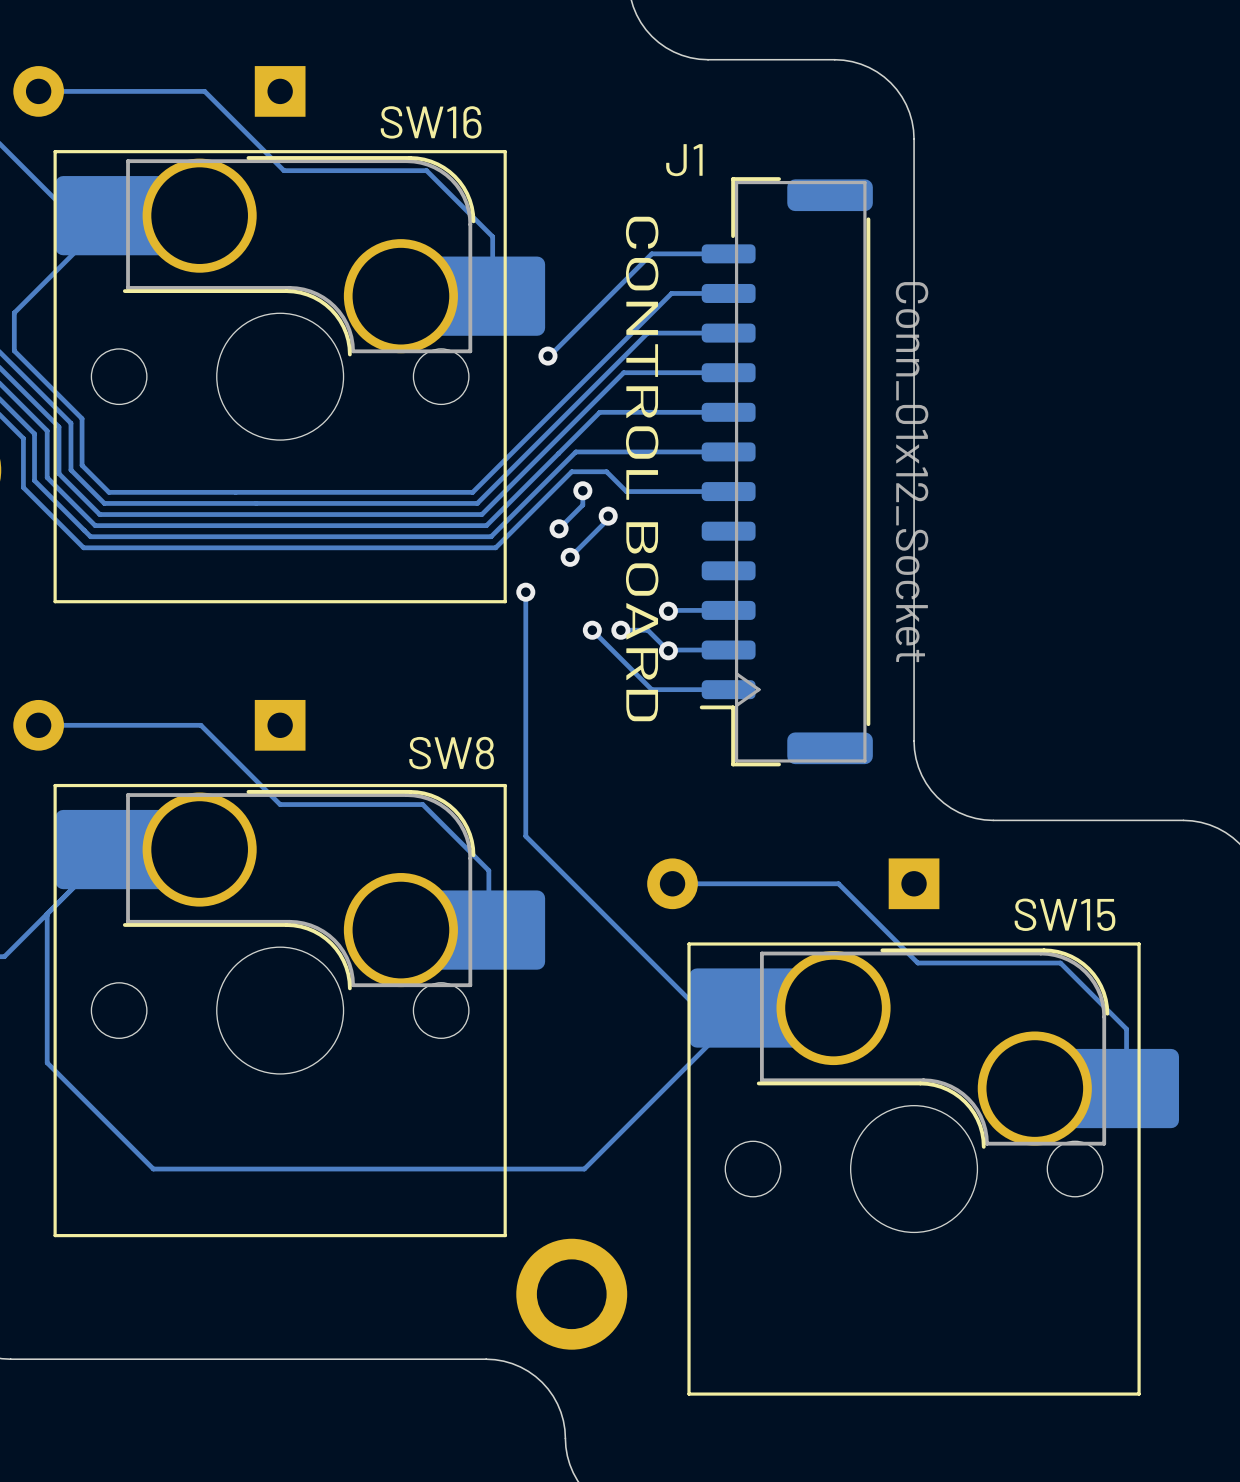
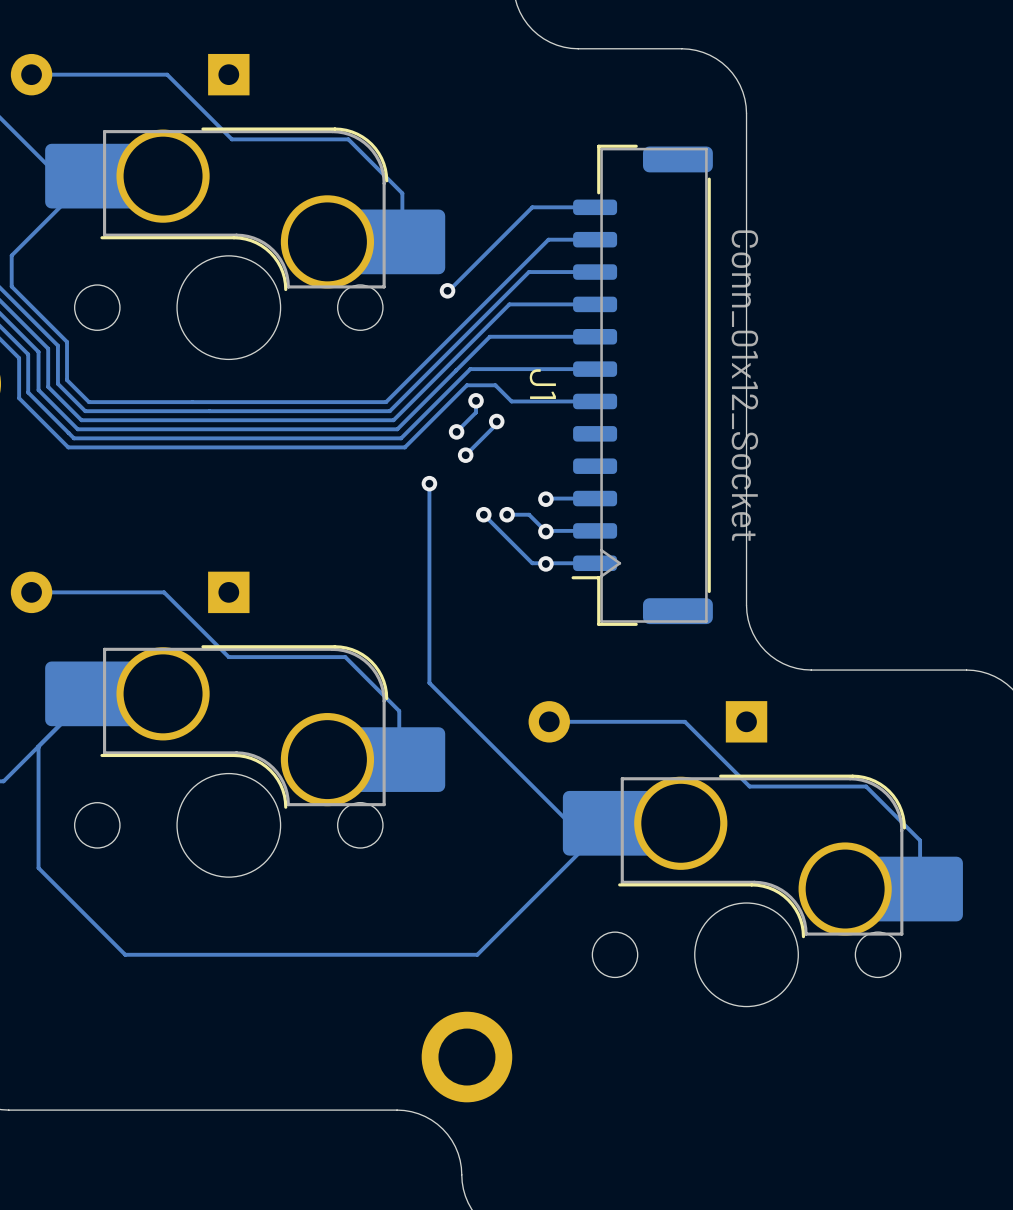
text: SW16 (431, 122) -> none
line: (505, 151) (55, 151) (55, 601) (505, 601) (505, 151) -> none
J1 name rotation: 0° (684, 160) -> 90° clockwise (542, 384)
J1 name position: J1 (684, 160) -> J1 (542, 384)
text: CONTROL BOARD (642, 468) -> none
via: none -> (545, 563)
text: SW8 (451, 753) -> none
line: (505, 785) (505, 1235) (55, 1235) (55, 785) (505, 785) -> none
text: SW15 (1065, 914) -> none
line: (1139, 944) (689, 944) (689, 1394) (1139, 1394) (1139, 944) -> none

